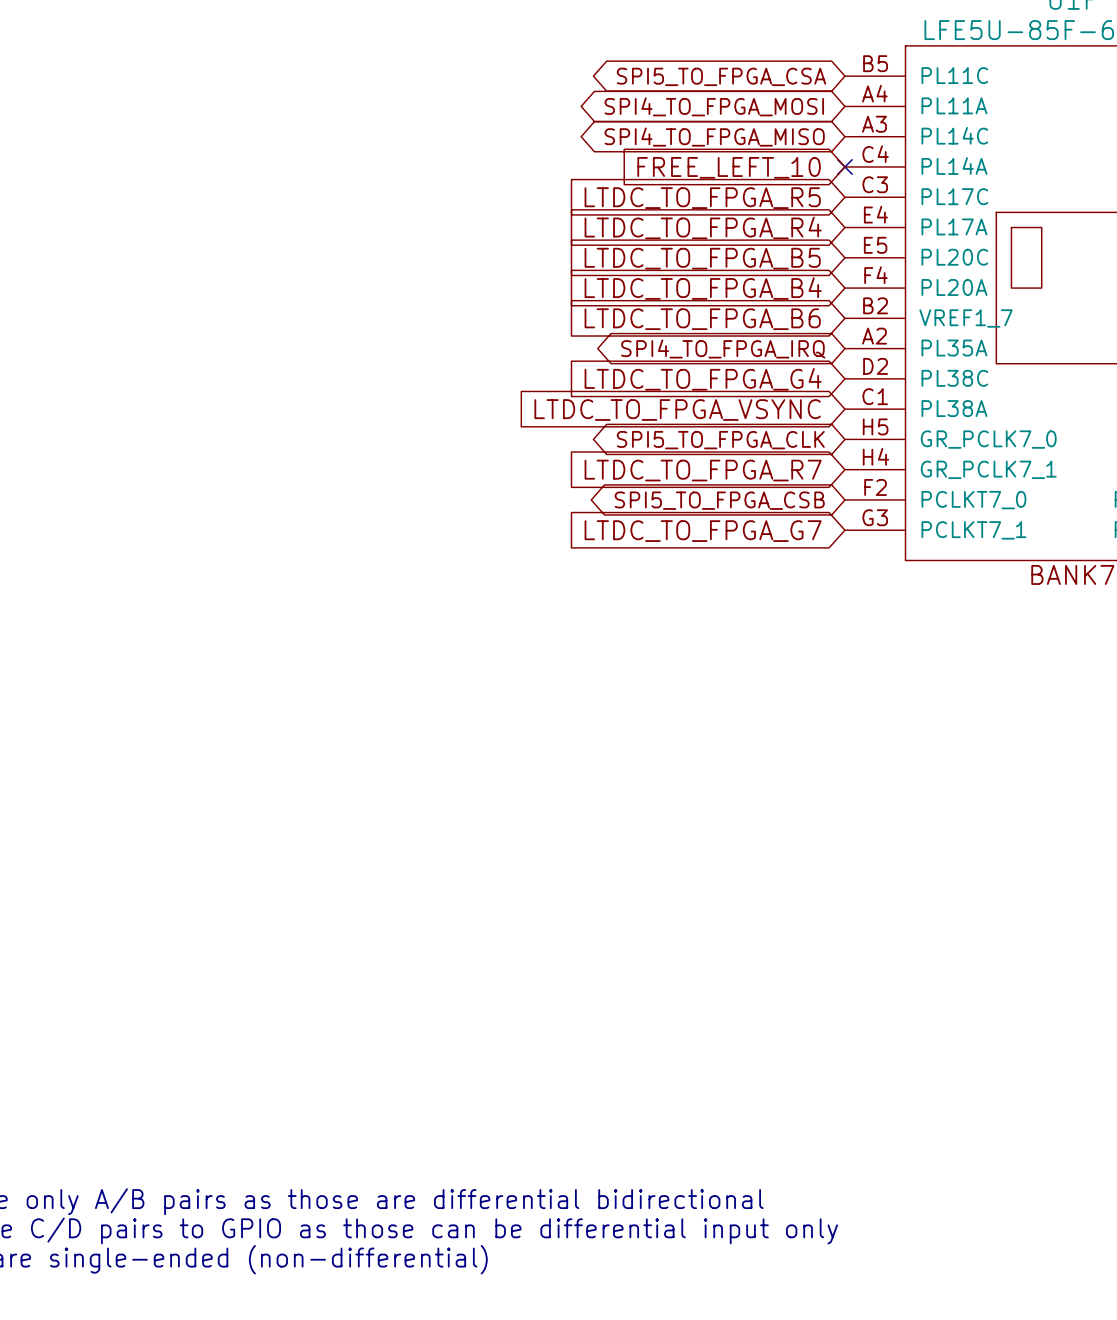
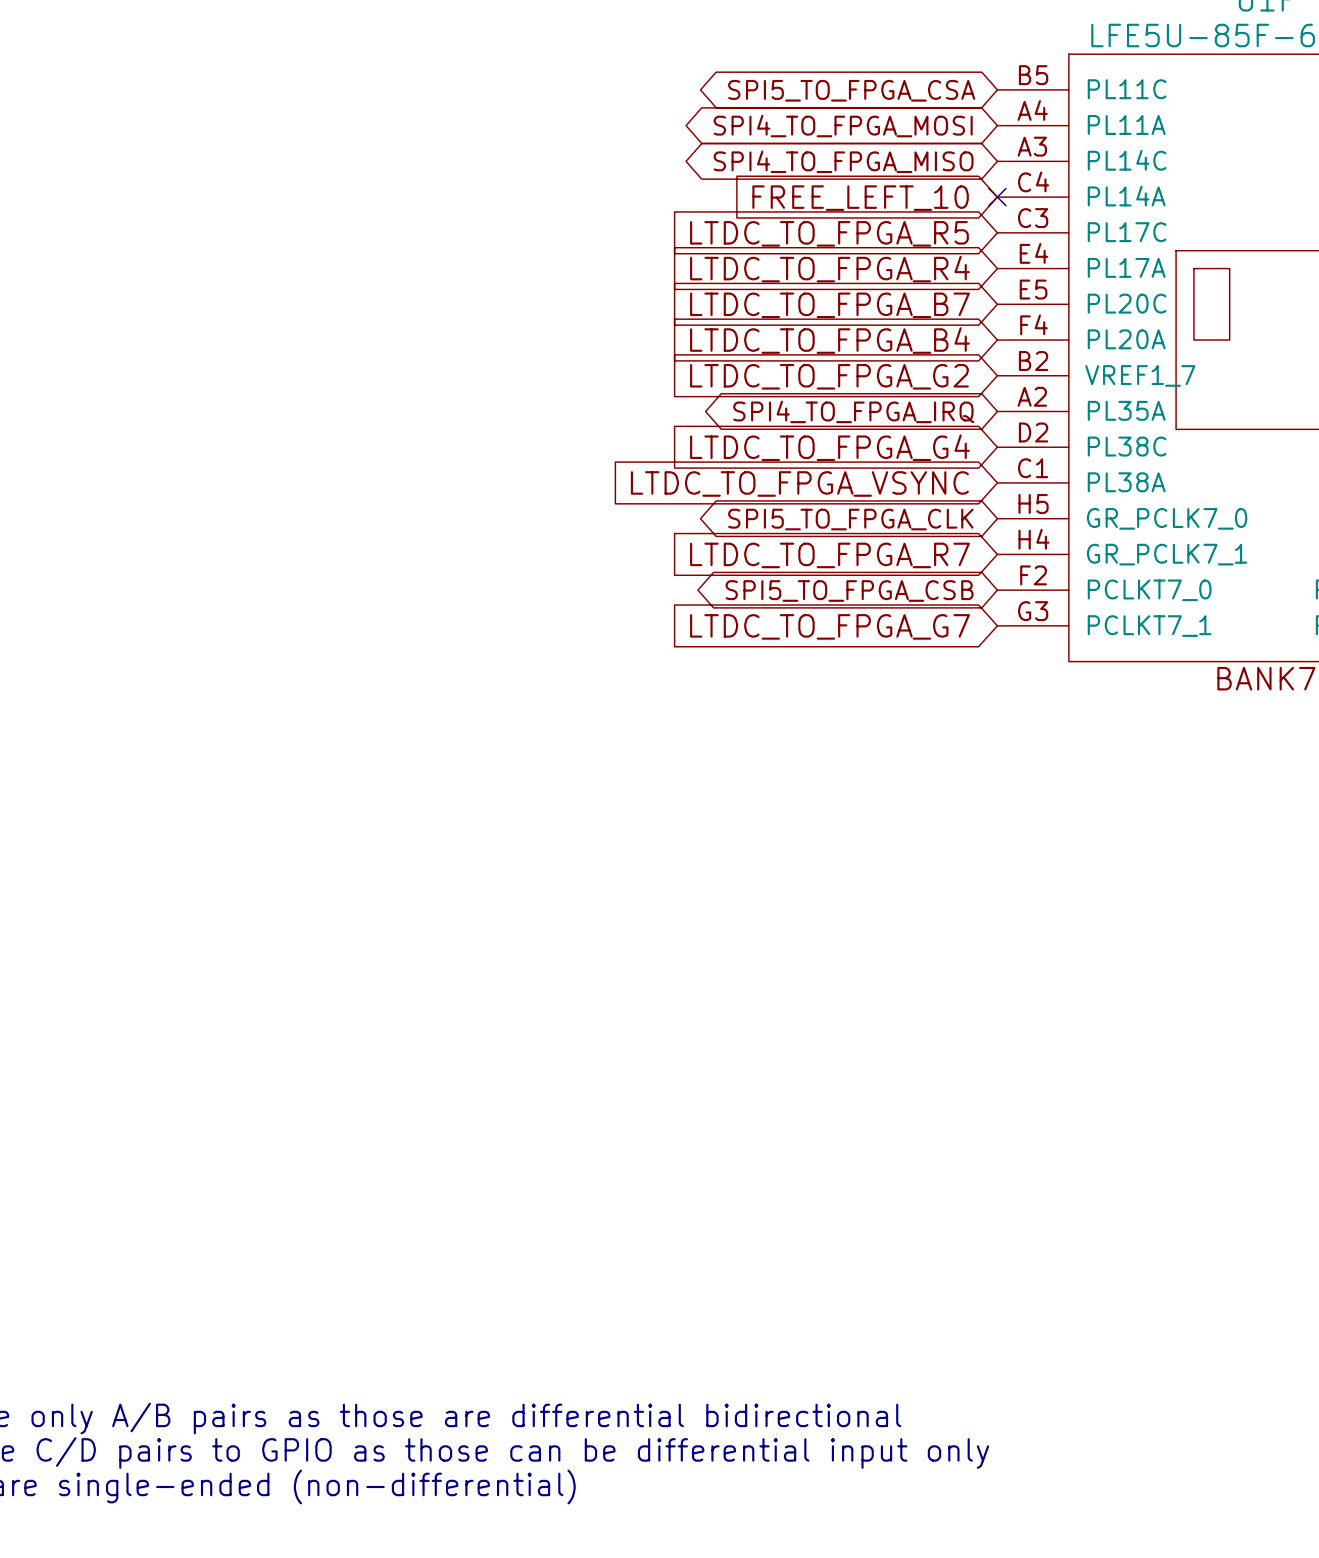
global label: LTDC_TO_FPGA_B5 (702, 258) -> LTDC_TO_FPGA_B7 (829, 305)
global label: LTDC_TO_FPGA_B6 (702, 319) -> LTDC_TO_FPGA_G2 (829, 376)

